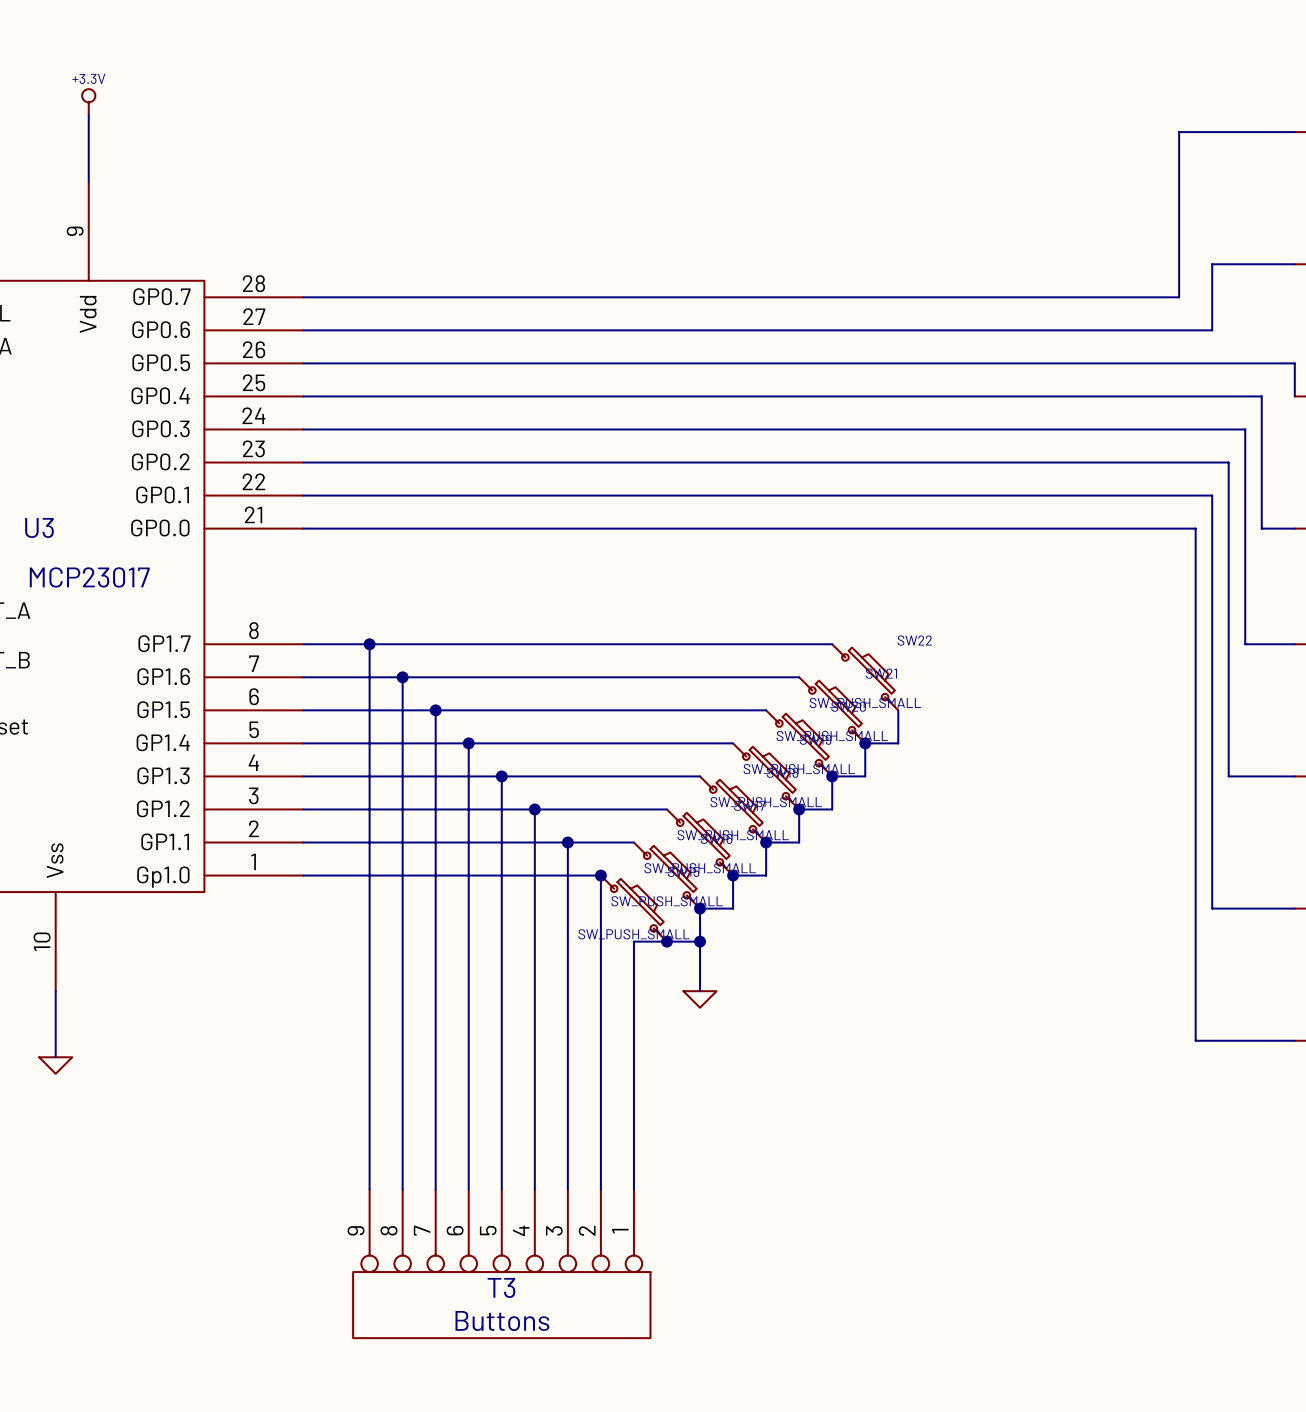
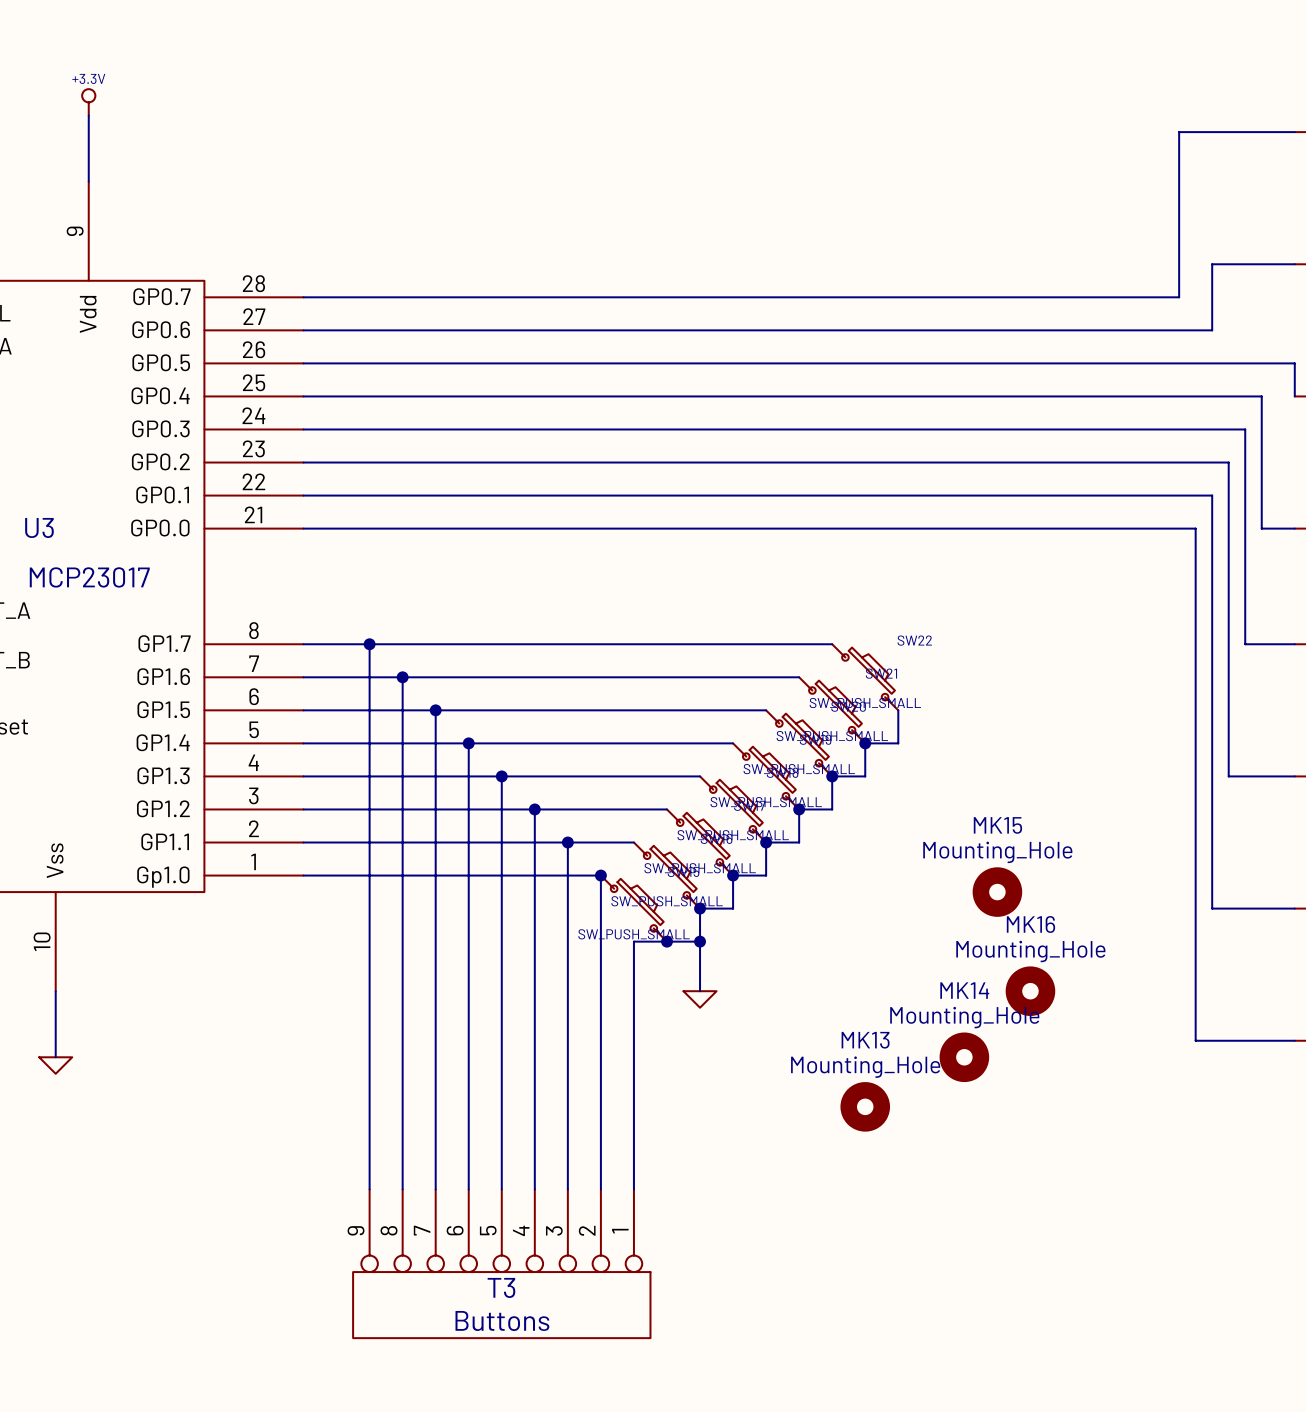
MK15: none -> Mounting_Hole (997, 892)
MK16: none -> Mounting_Hole (1030, 991)
MK14: none -> Mounting_Hole (964, 1057)
MK13: none -> Mounting_Hole (865, 1106)

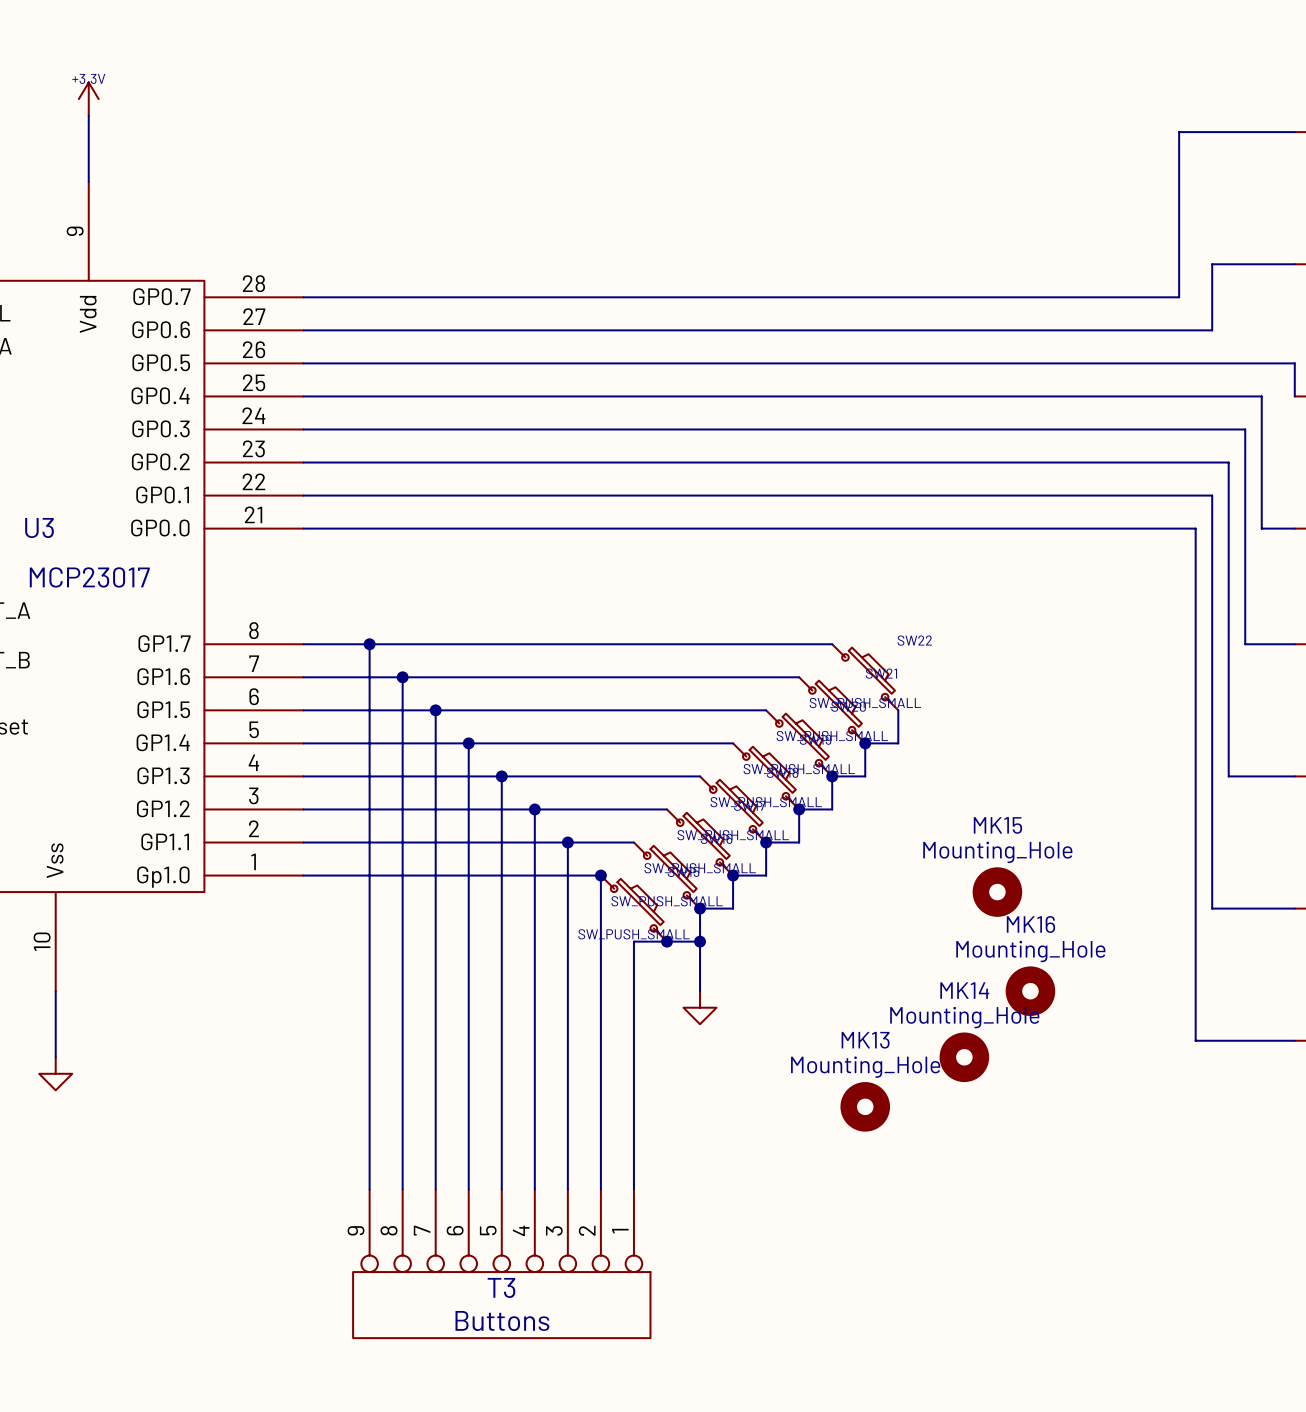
power symbol shape: [82, 89, 96, 116] -> [78, 82, 99, 116]
power symbol shape: [683, 991, 717, 1008] -> [683, 991, 717, 1025]
power symbol shape: [39, 1057, 73, 1074] -> [39, 1057, 73, 1091]

